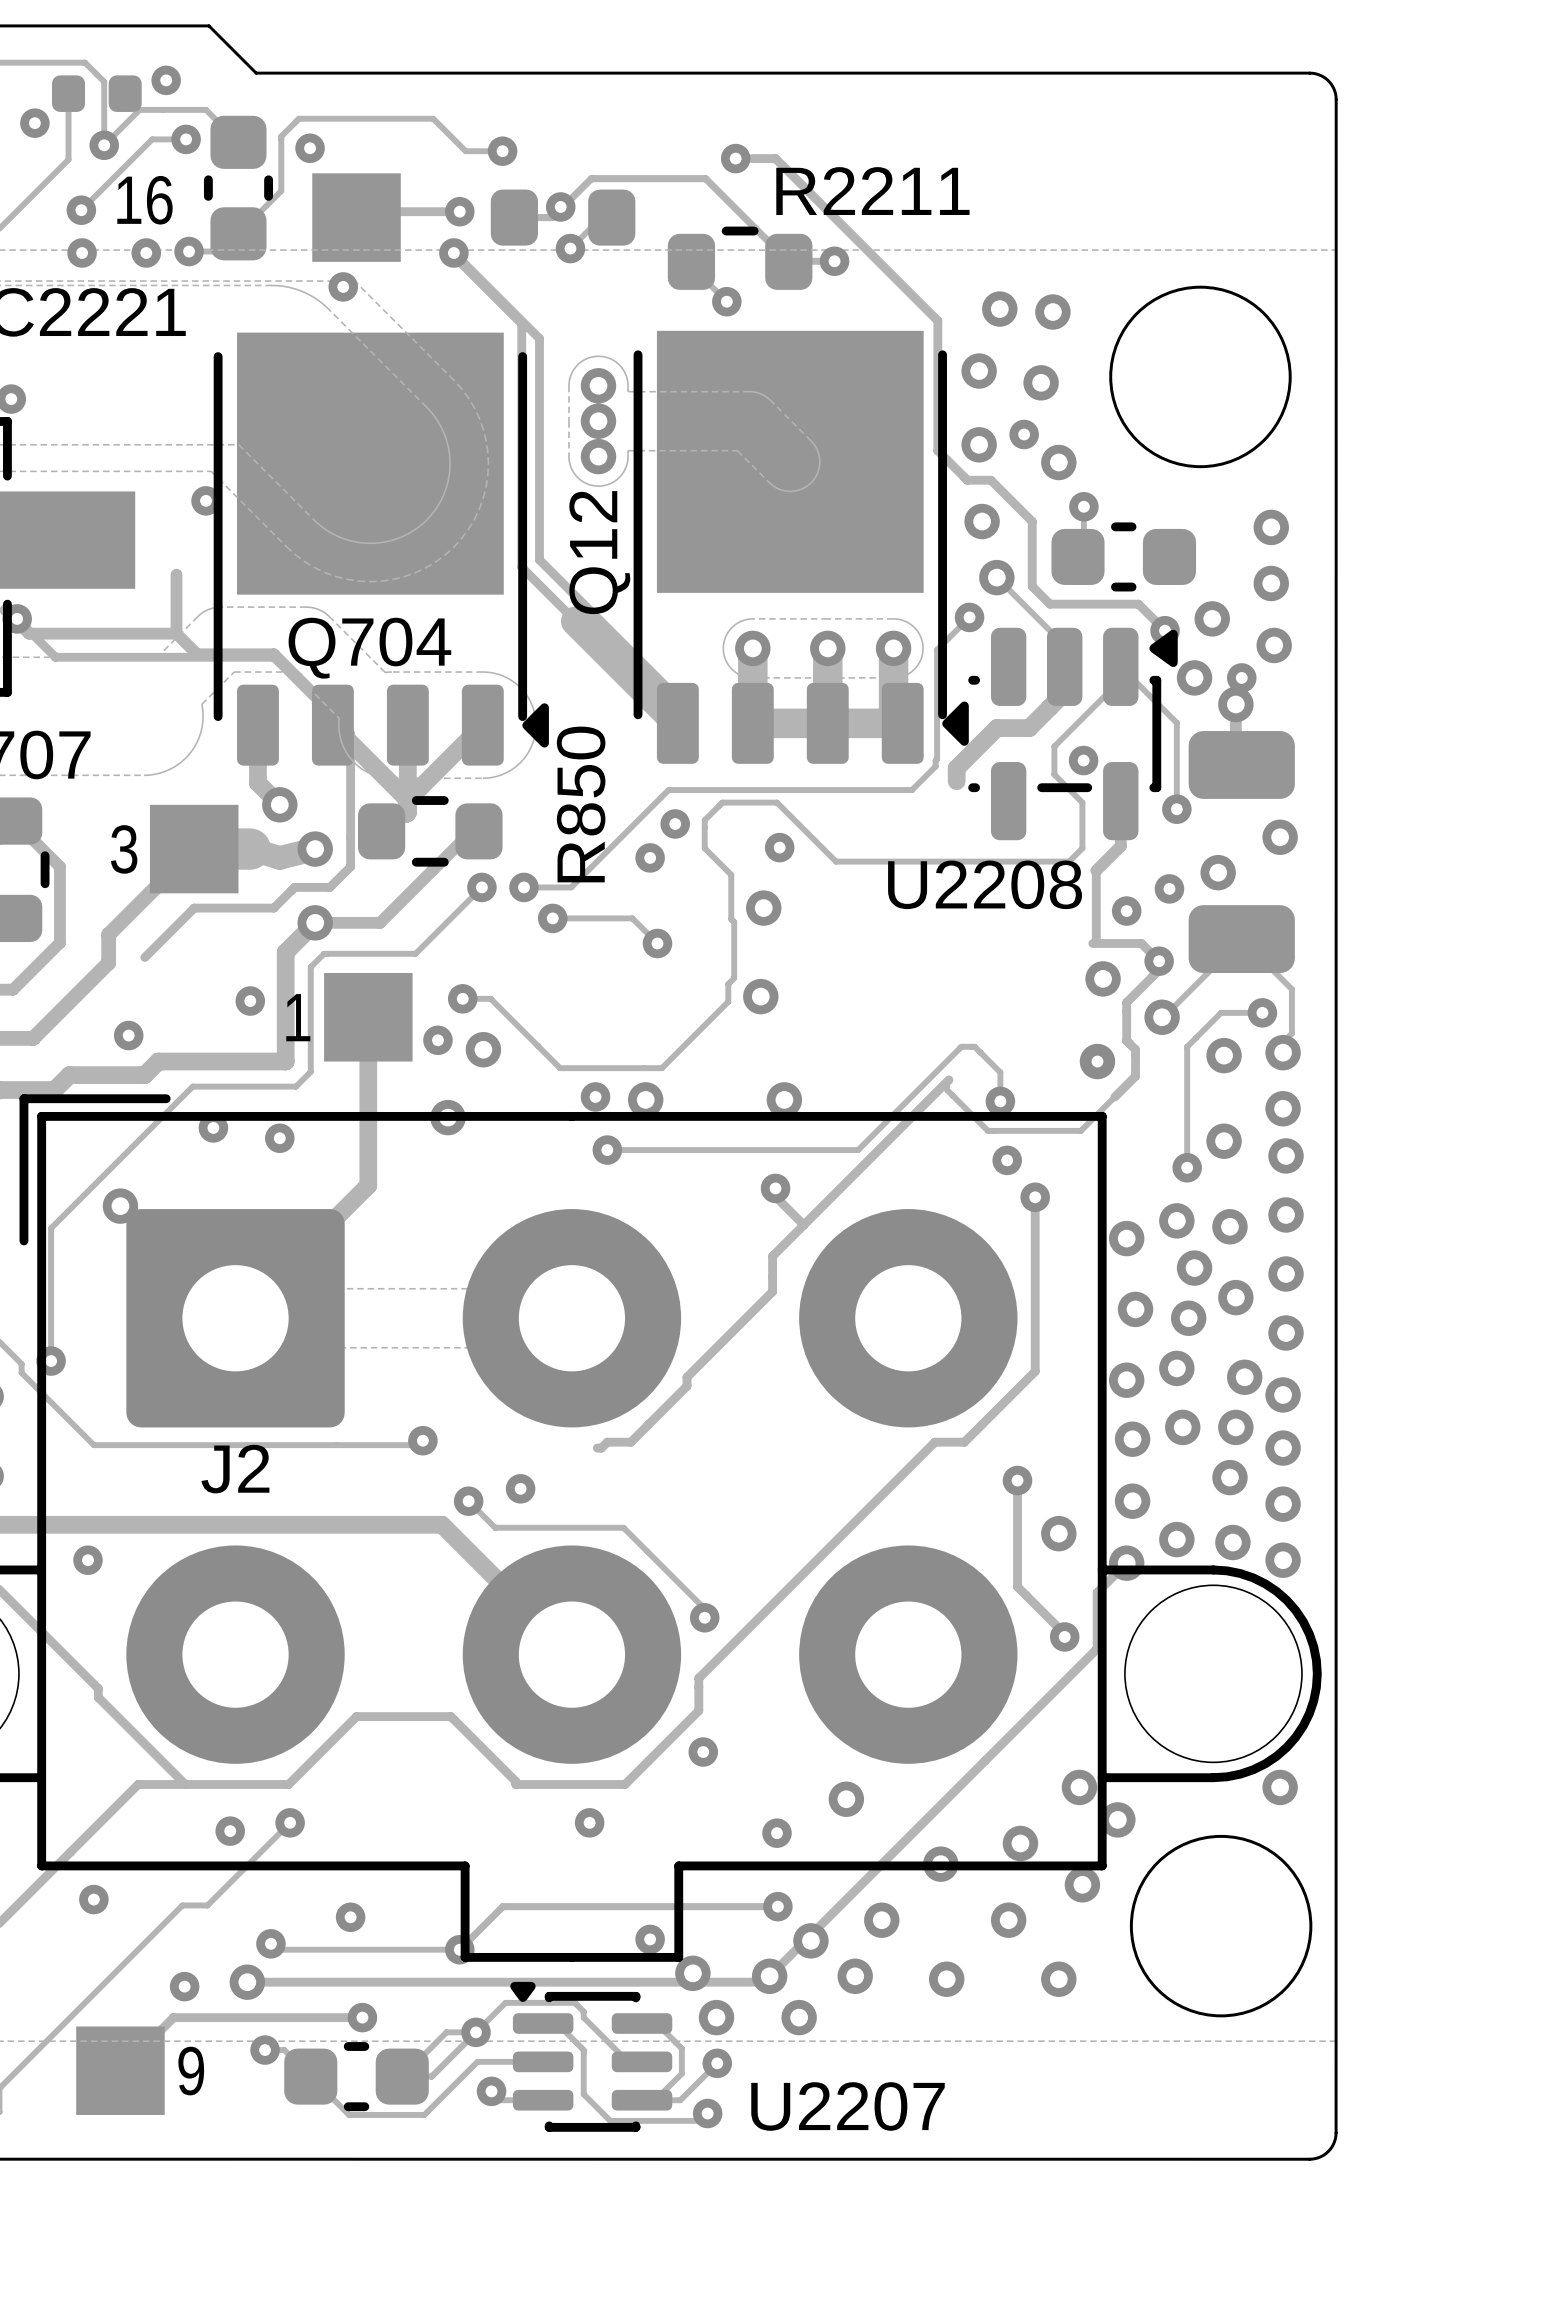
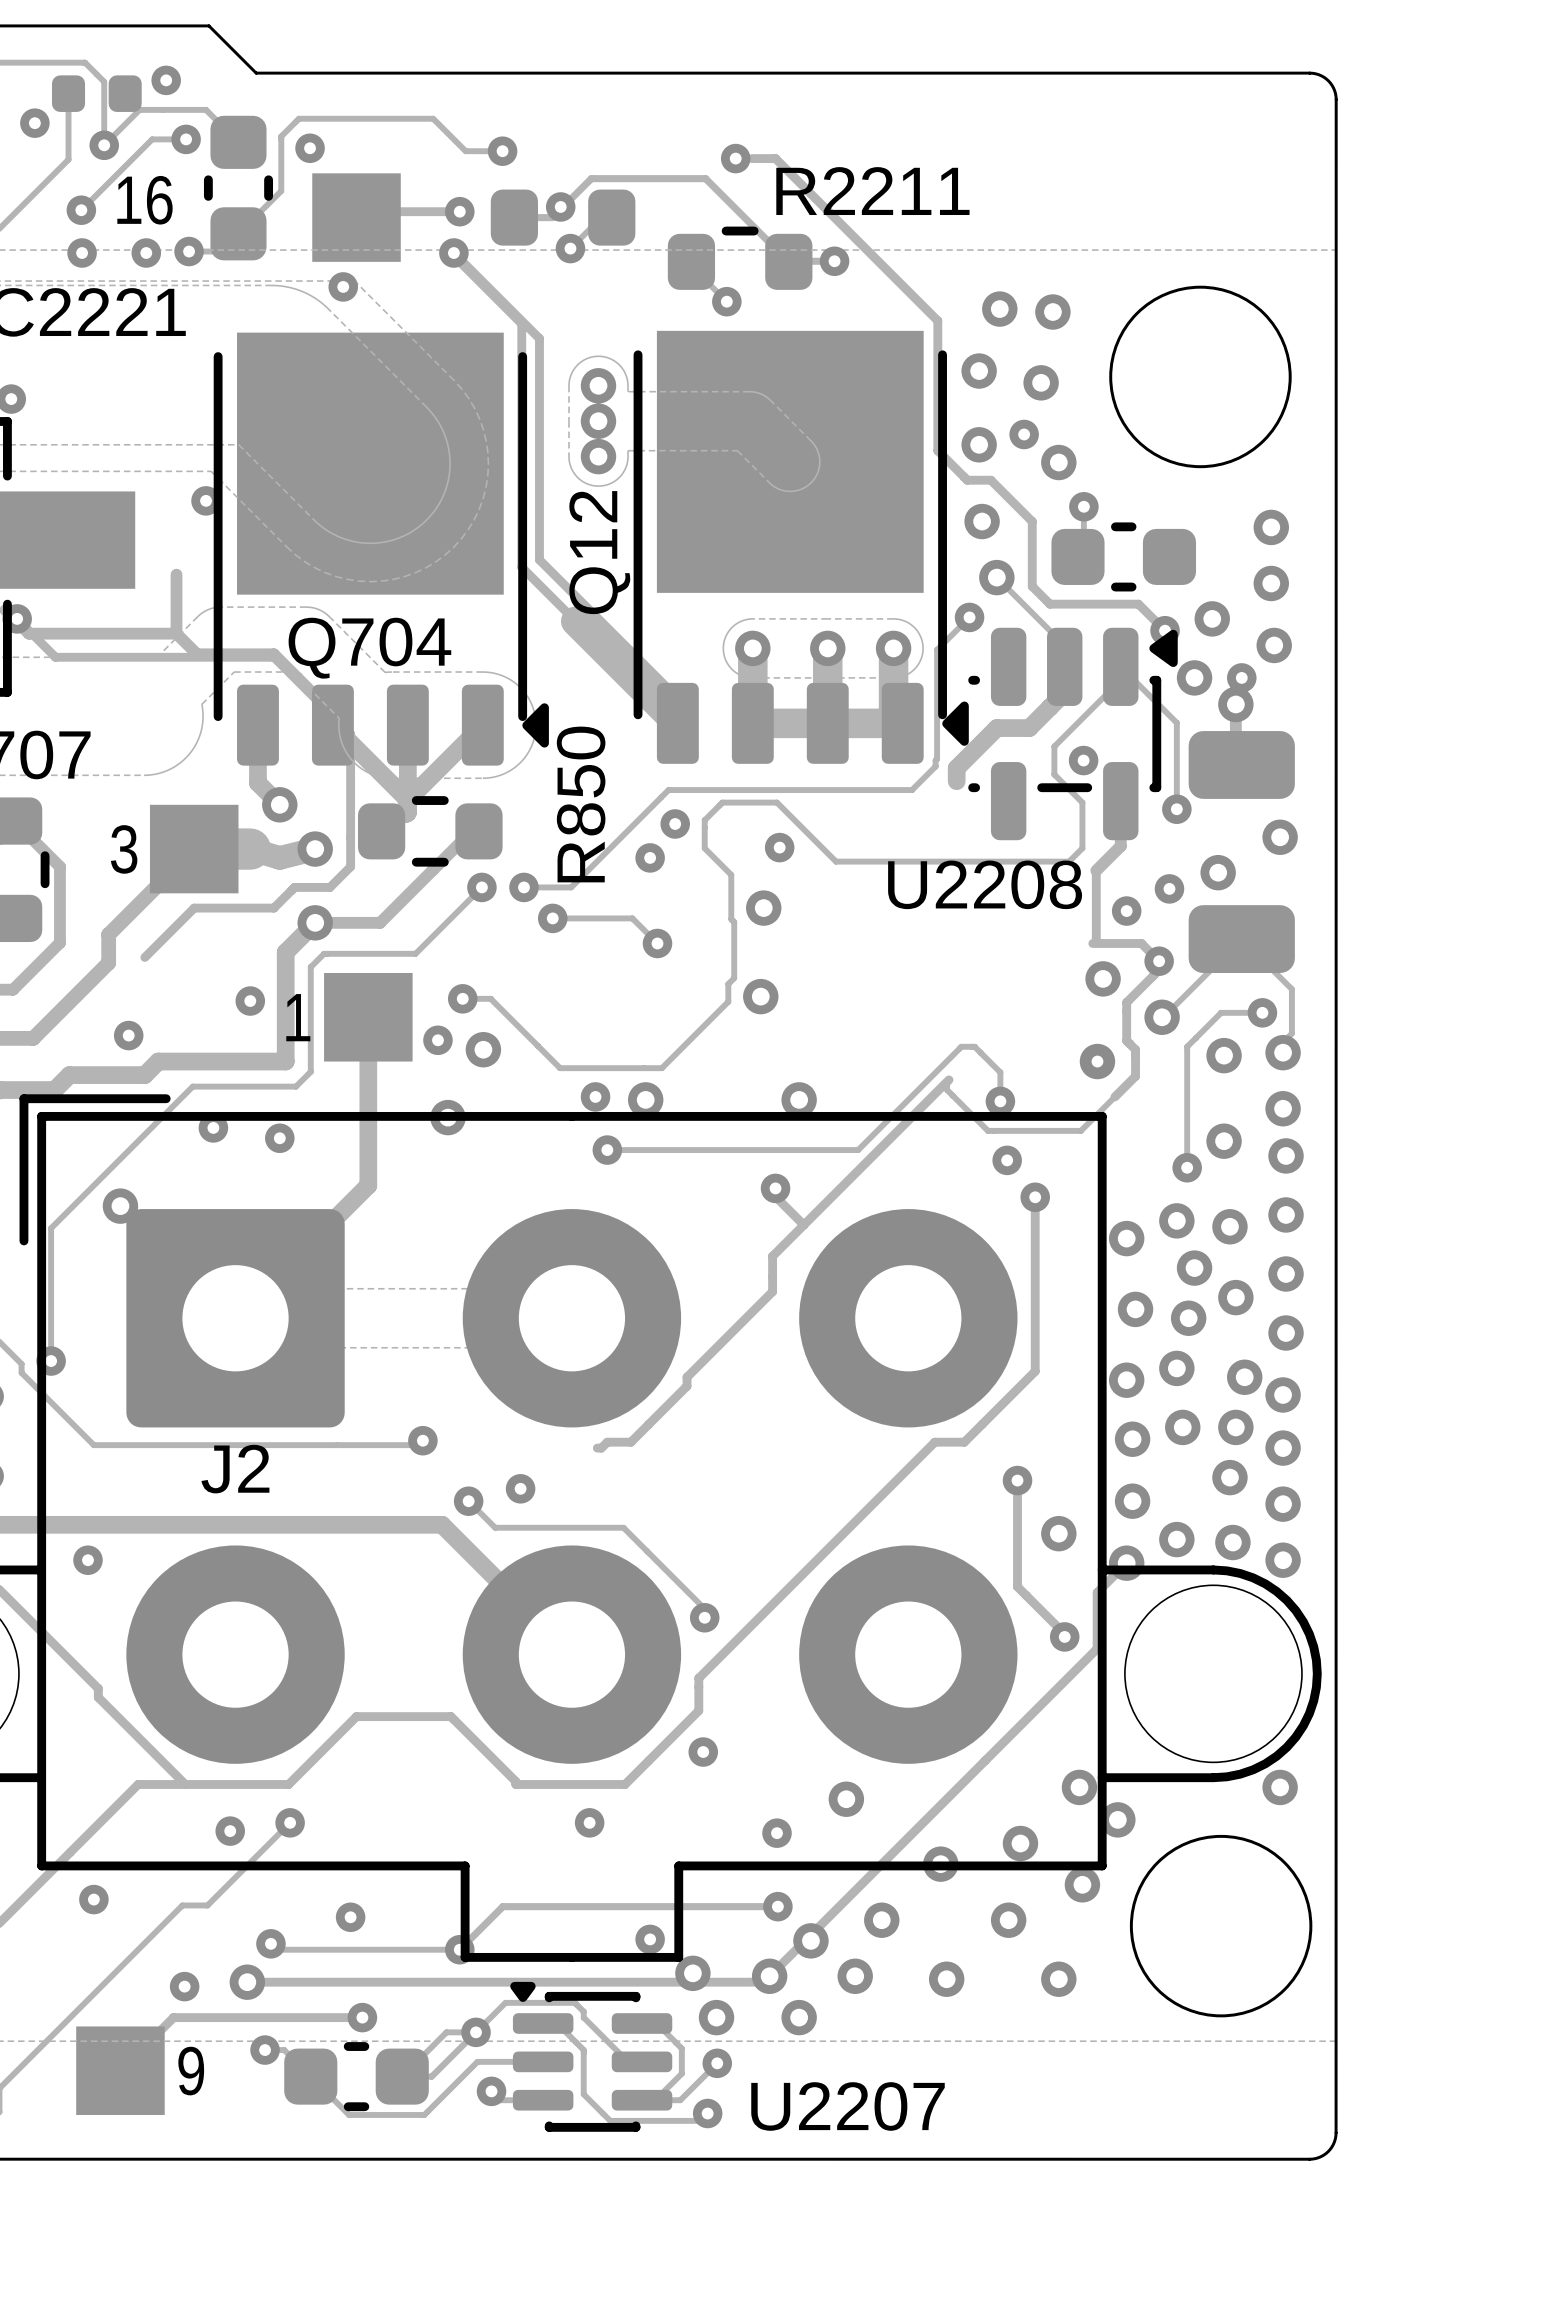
via position: (784, 1099) -> (799, 1099)

